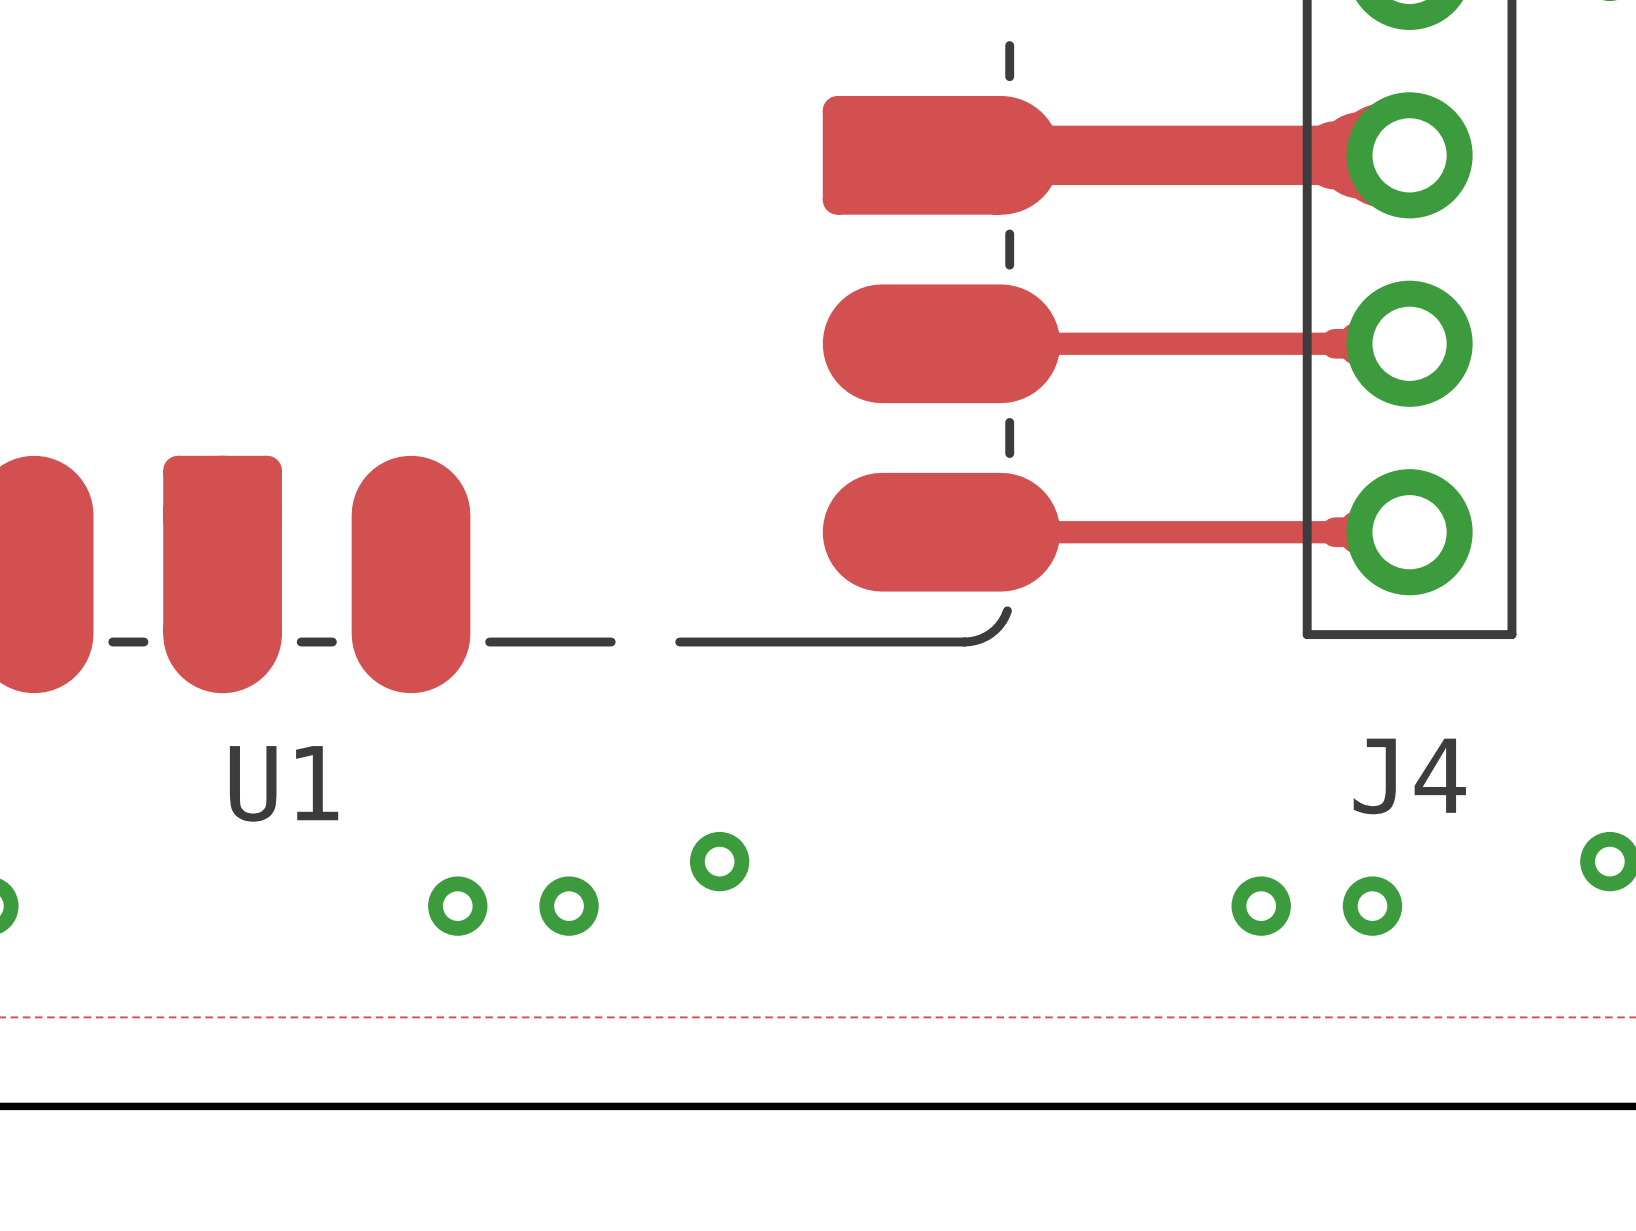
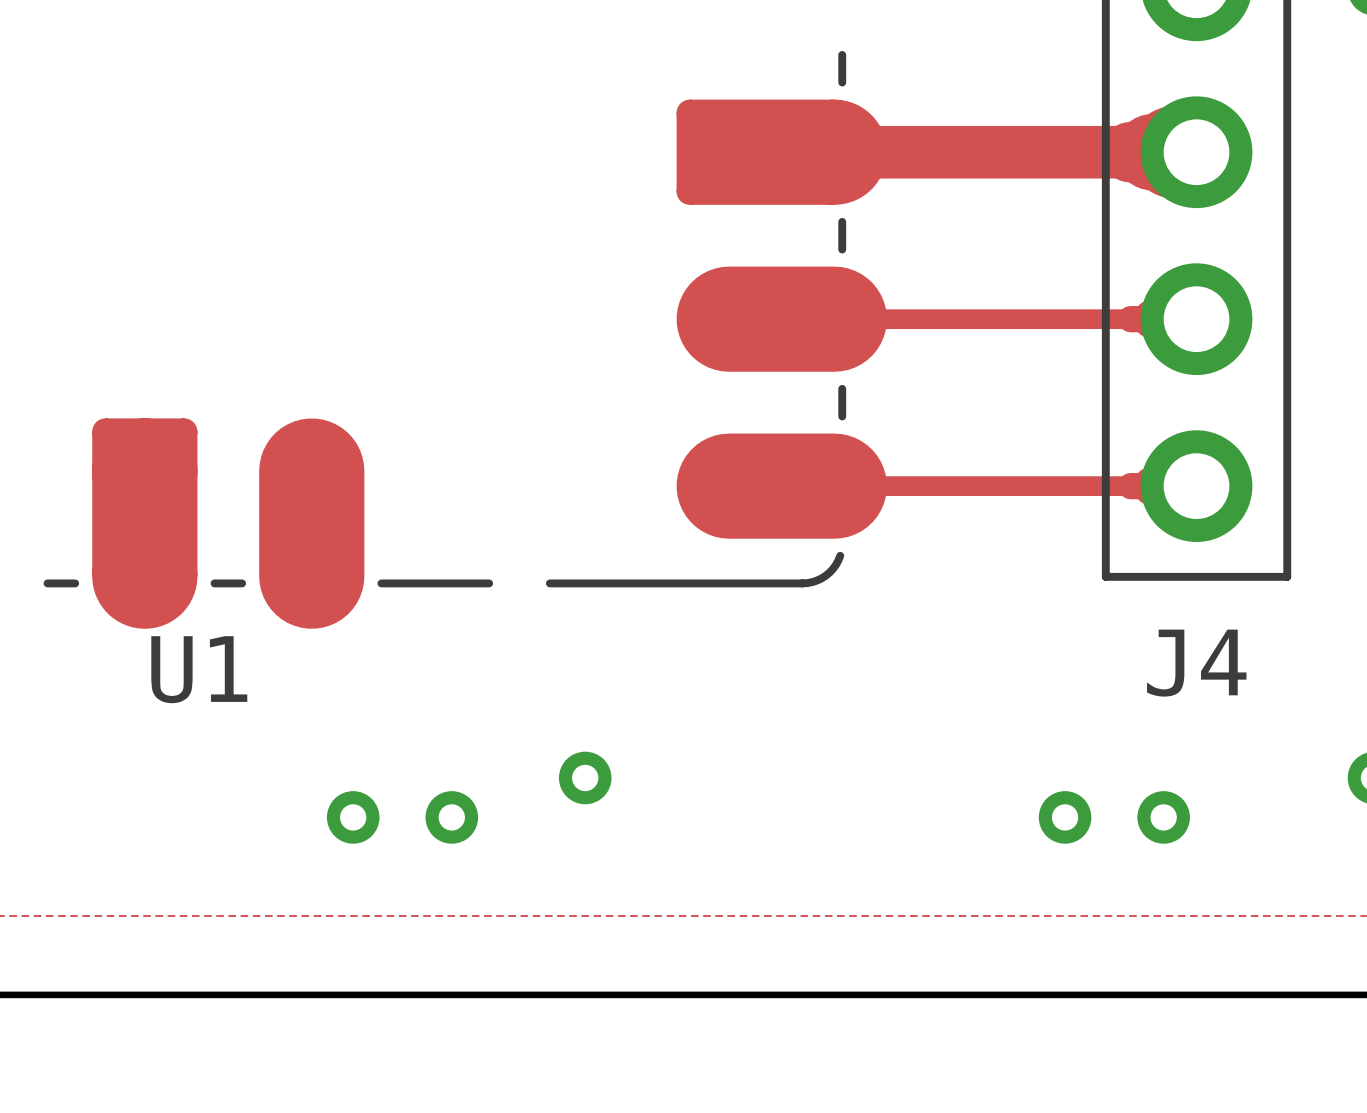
J4 name position: J4 (1409, 776) -> J4 (1196, 663)
U1 name position: U1 (284, 783) -> U1 (199, 669)

